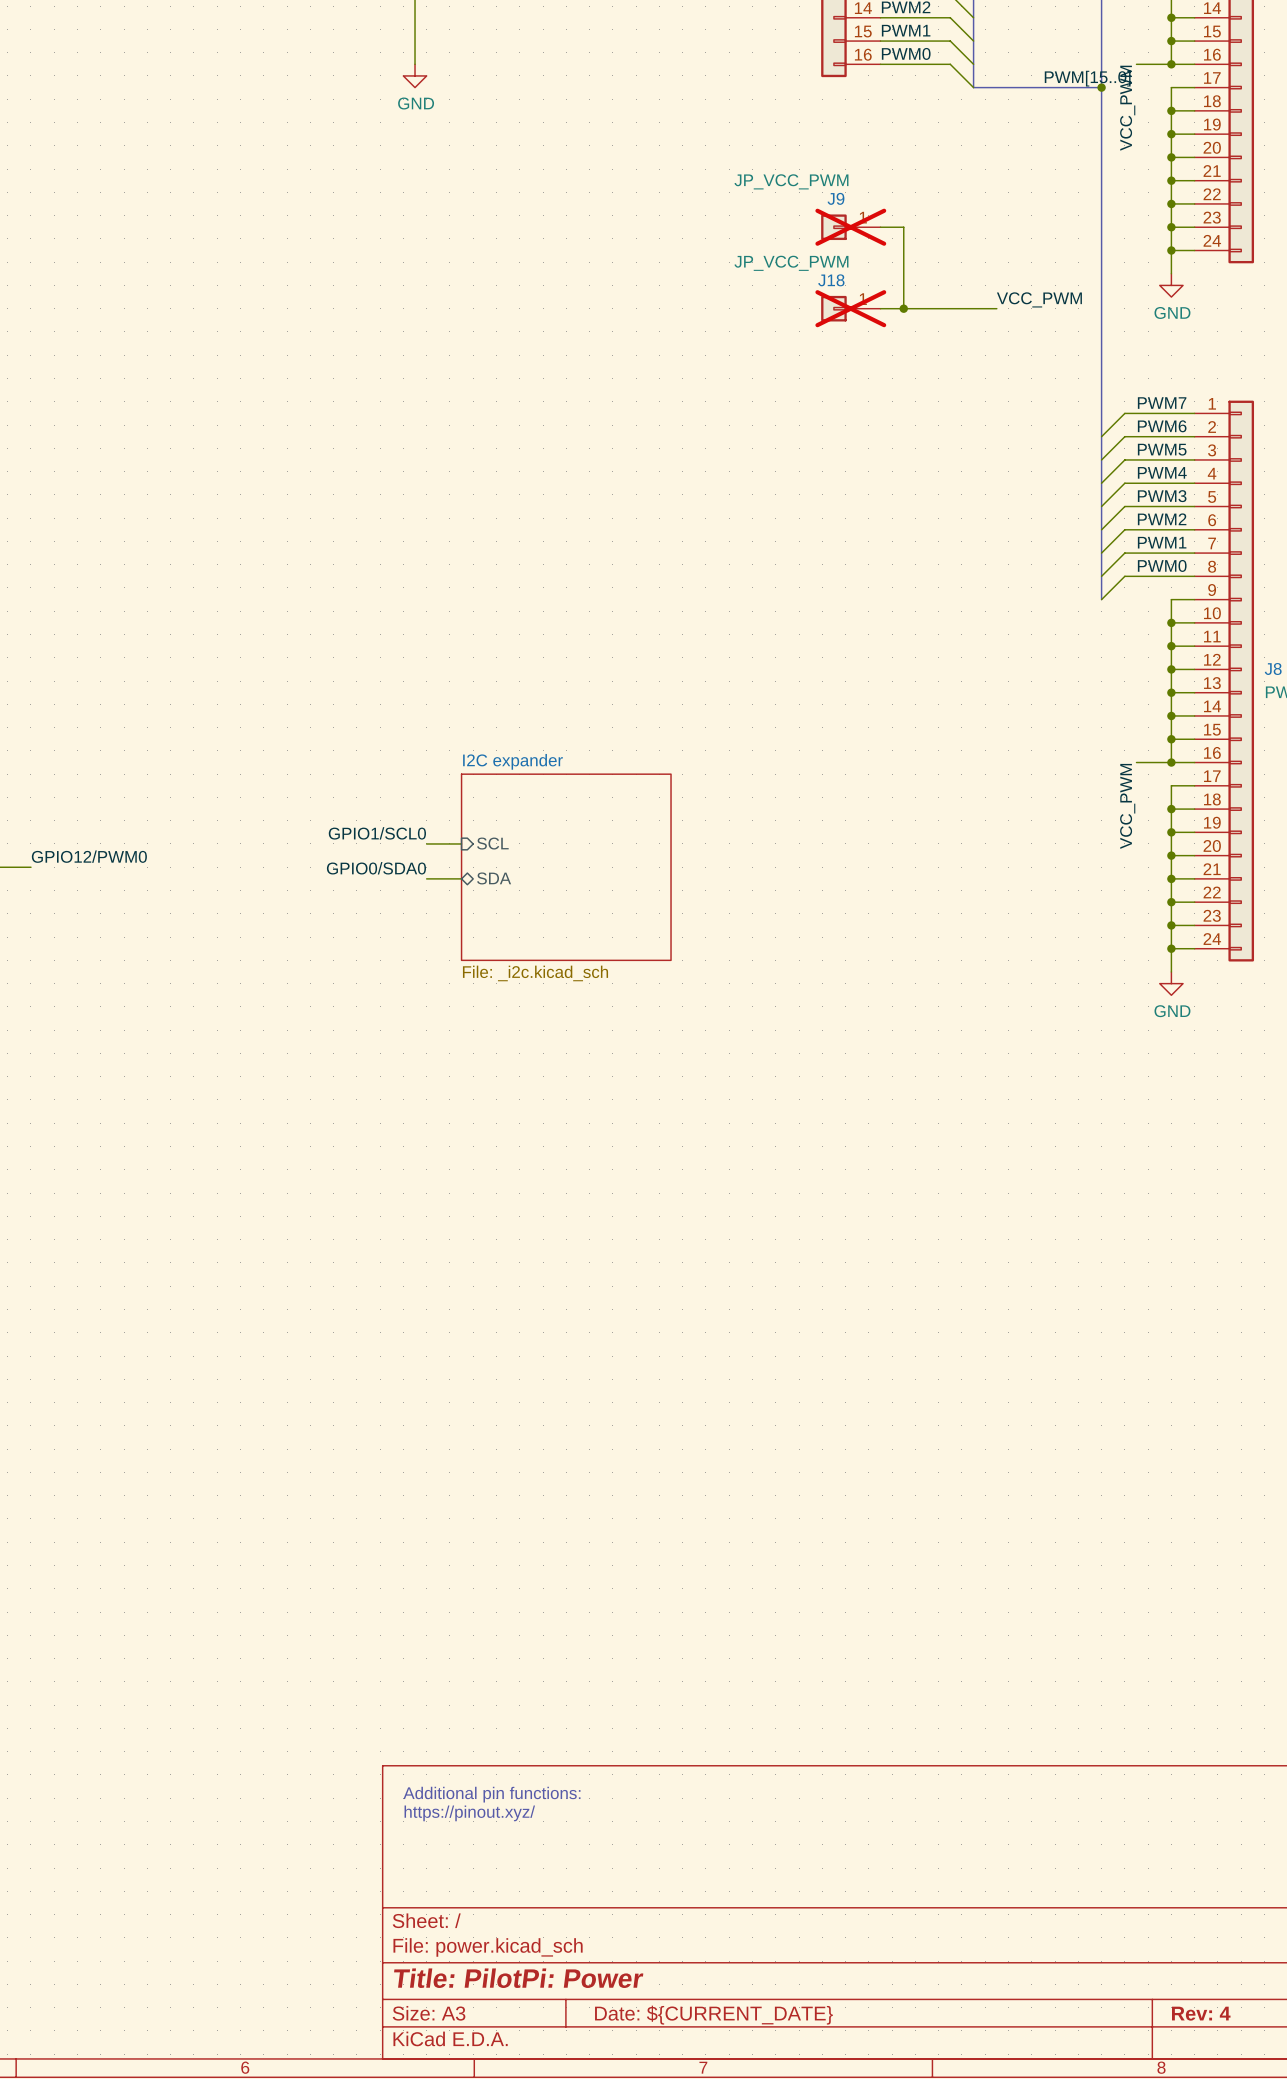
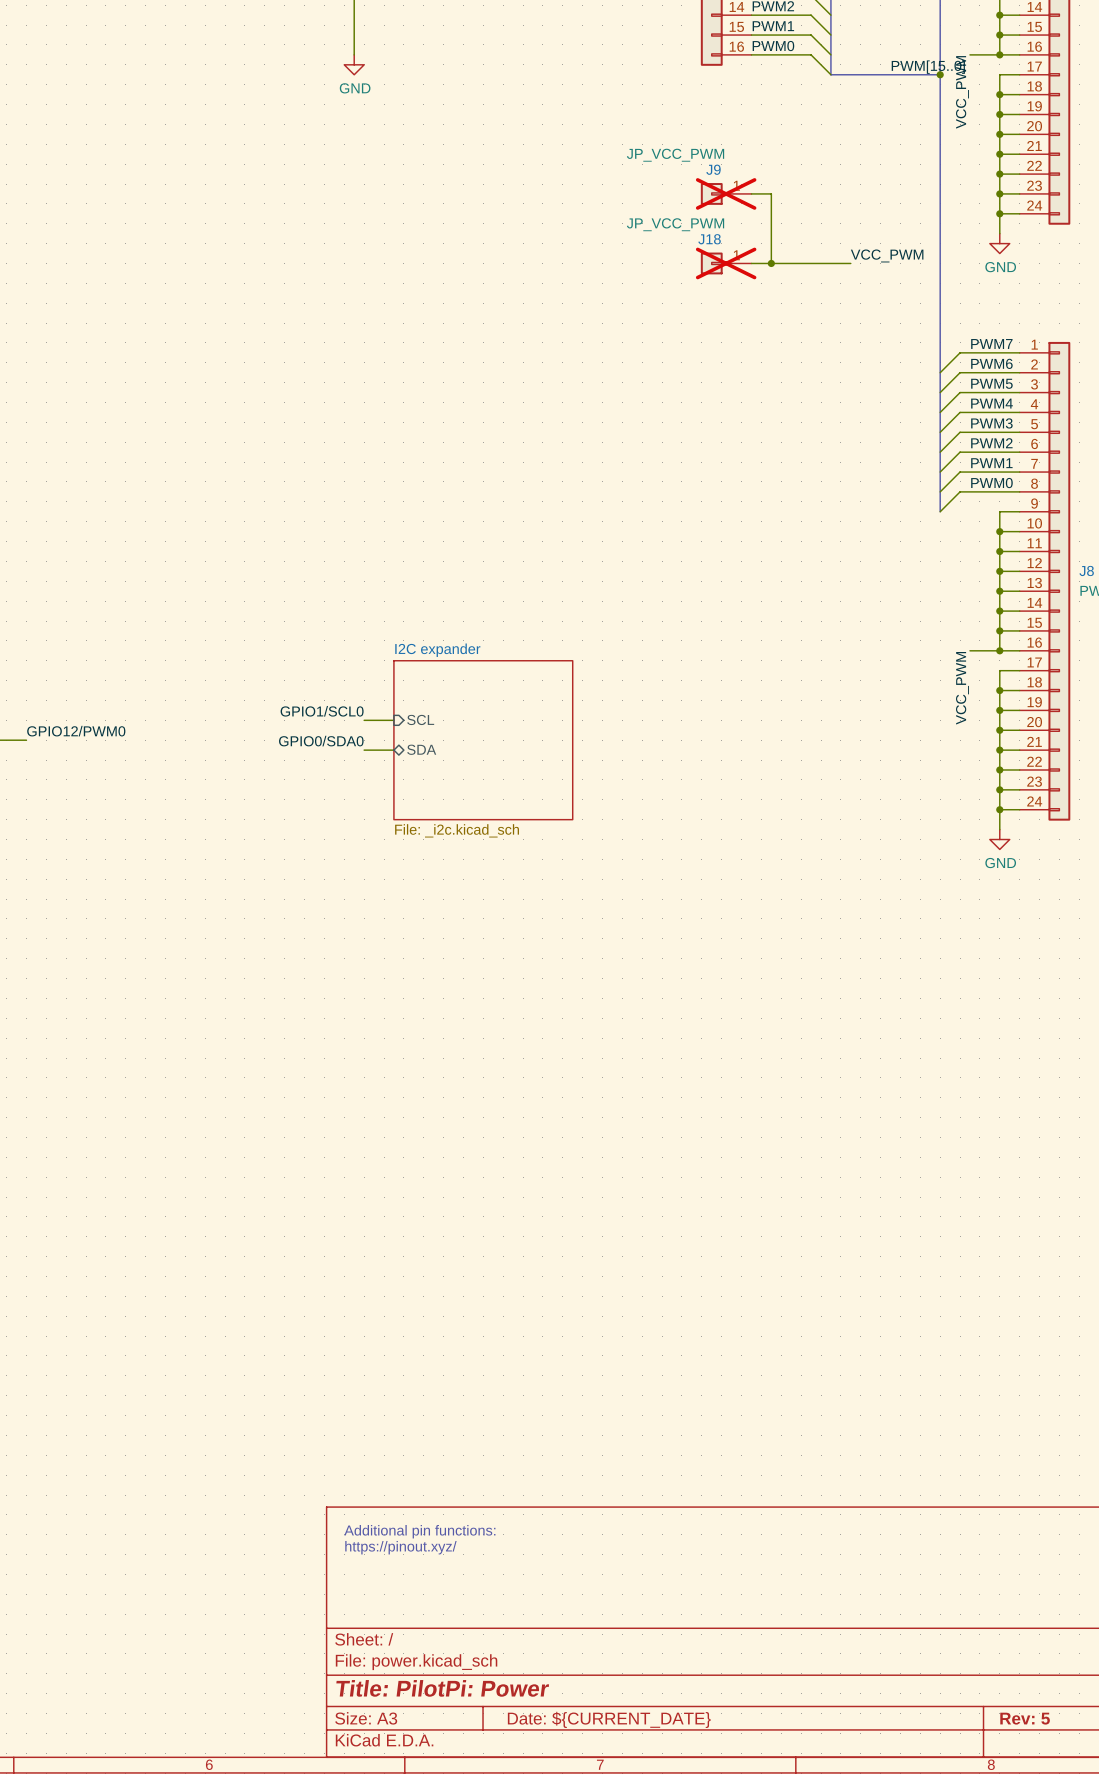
title block: Rev: 4 (1201, 2013) -> Rev: 5 (1025, 1718)

